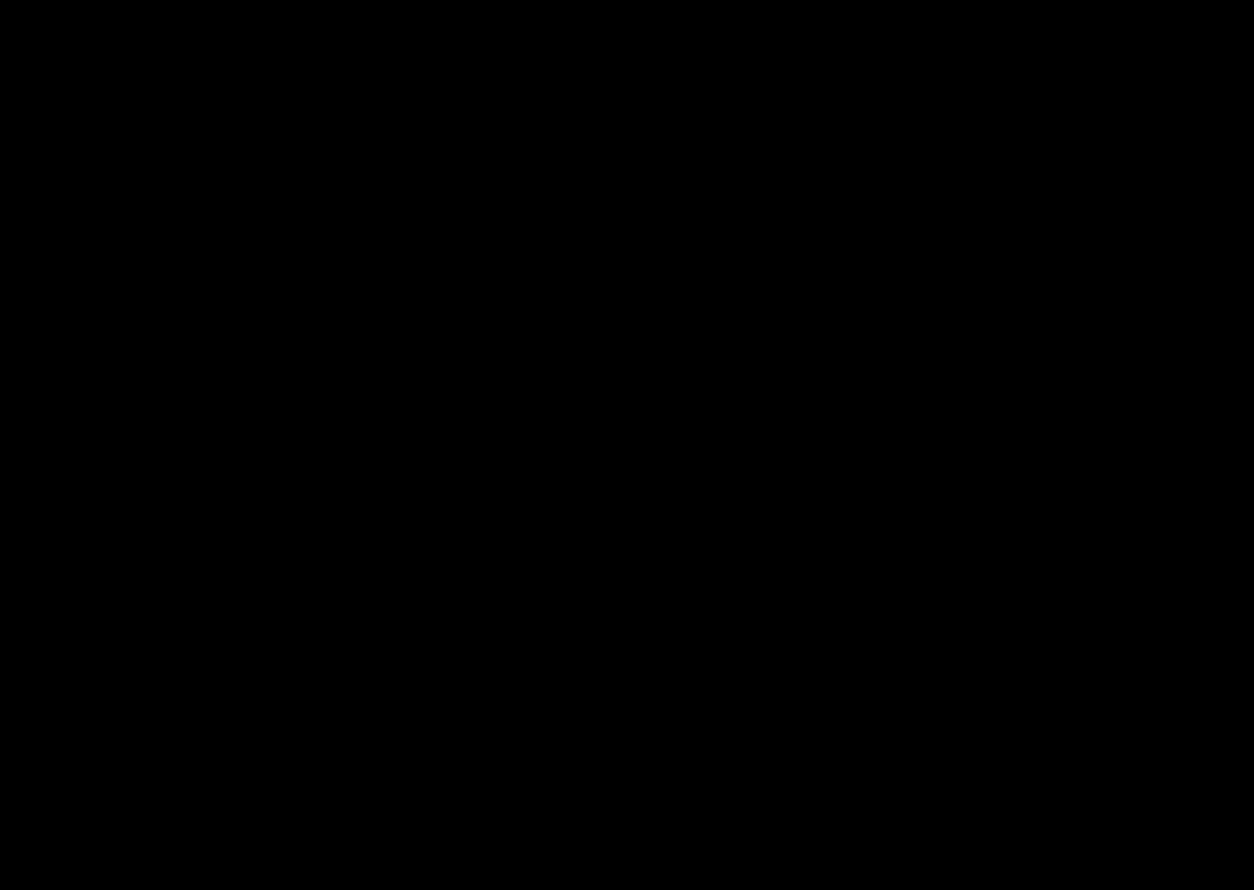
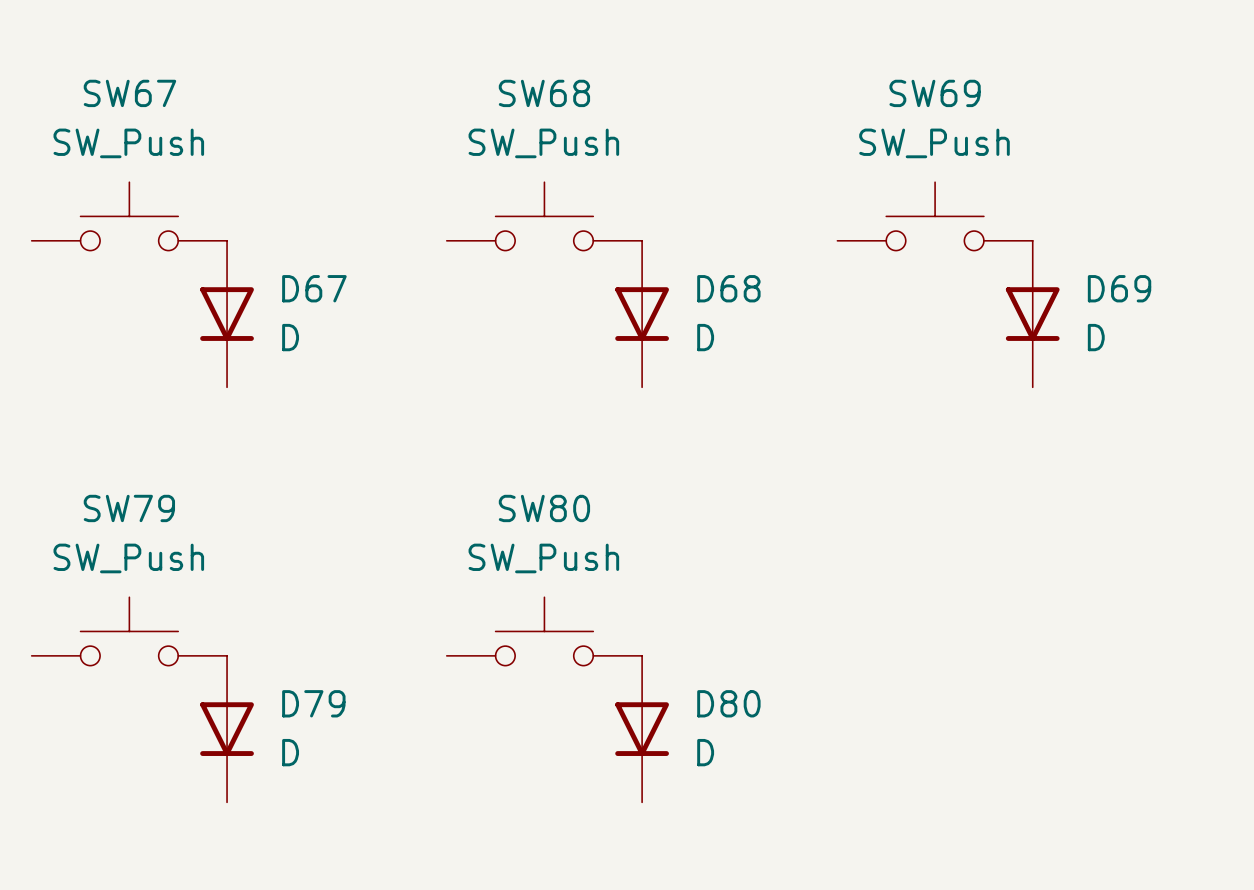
SW67: none -> SW_Push (129, 216)
SW68: none -> SW_Push (544, 216)
SW69: none -> SW_Push (935, 216)
D67: none -> D (227, 314)
D68: none -> D (642, 314)
D69: none -> D (1032, 314)
SW79: none -> SW_Push (129, 631)
SW80: none -> SW_Push (544, 631)
D79: none -> D (227, 729)
D80: none -> D (642, 729)

